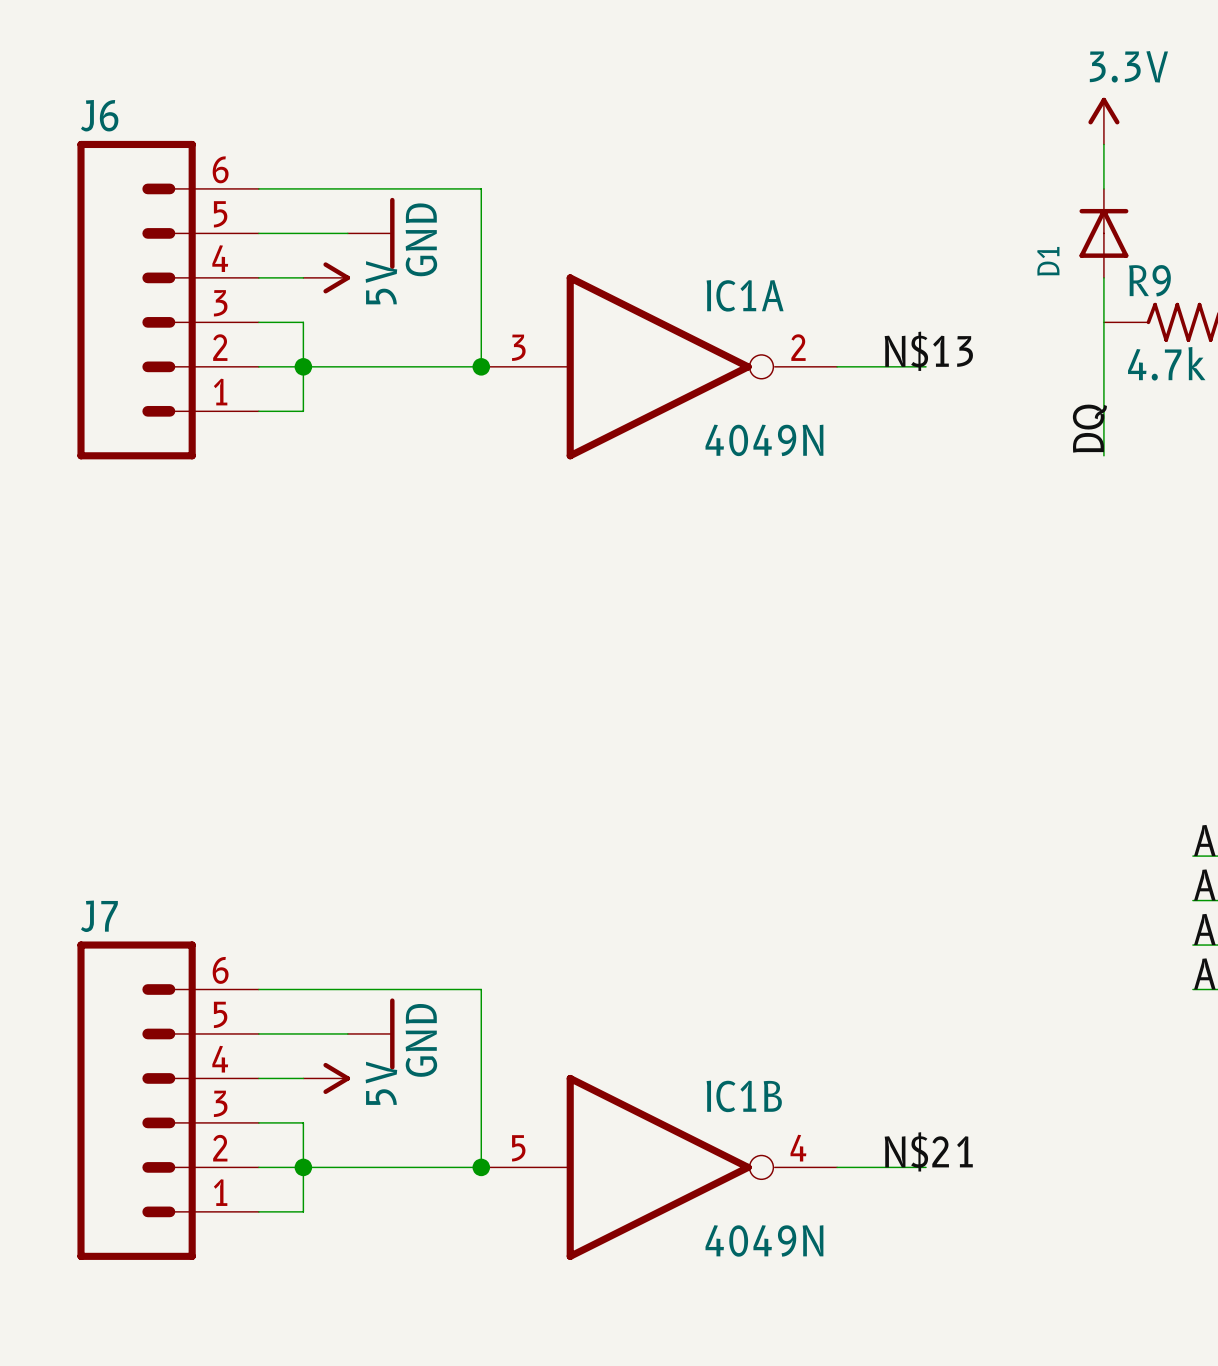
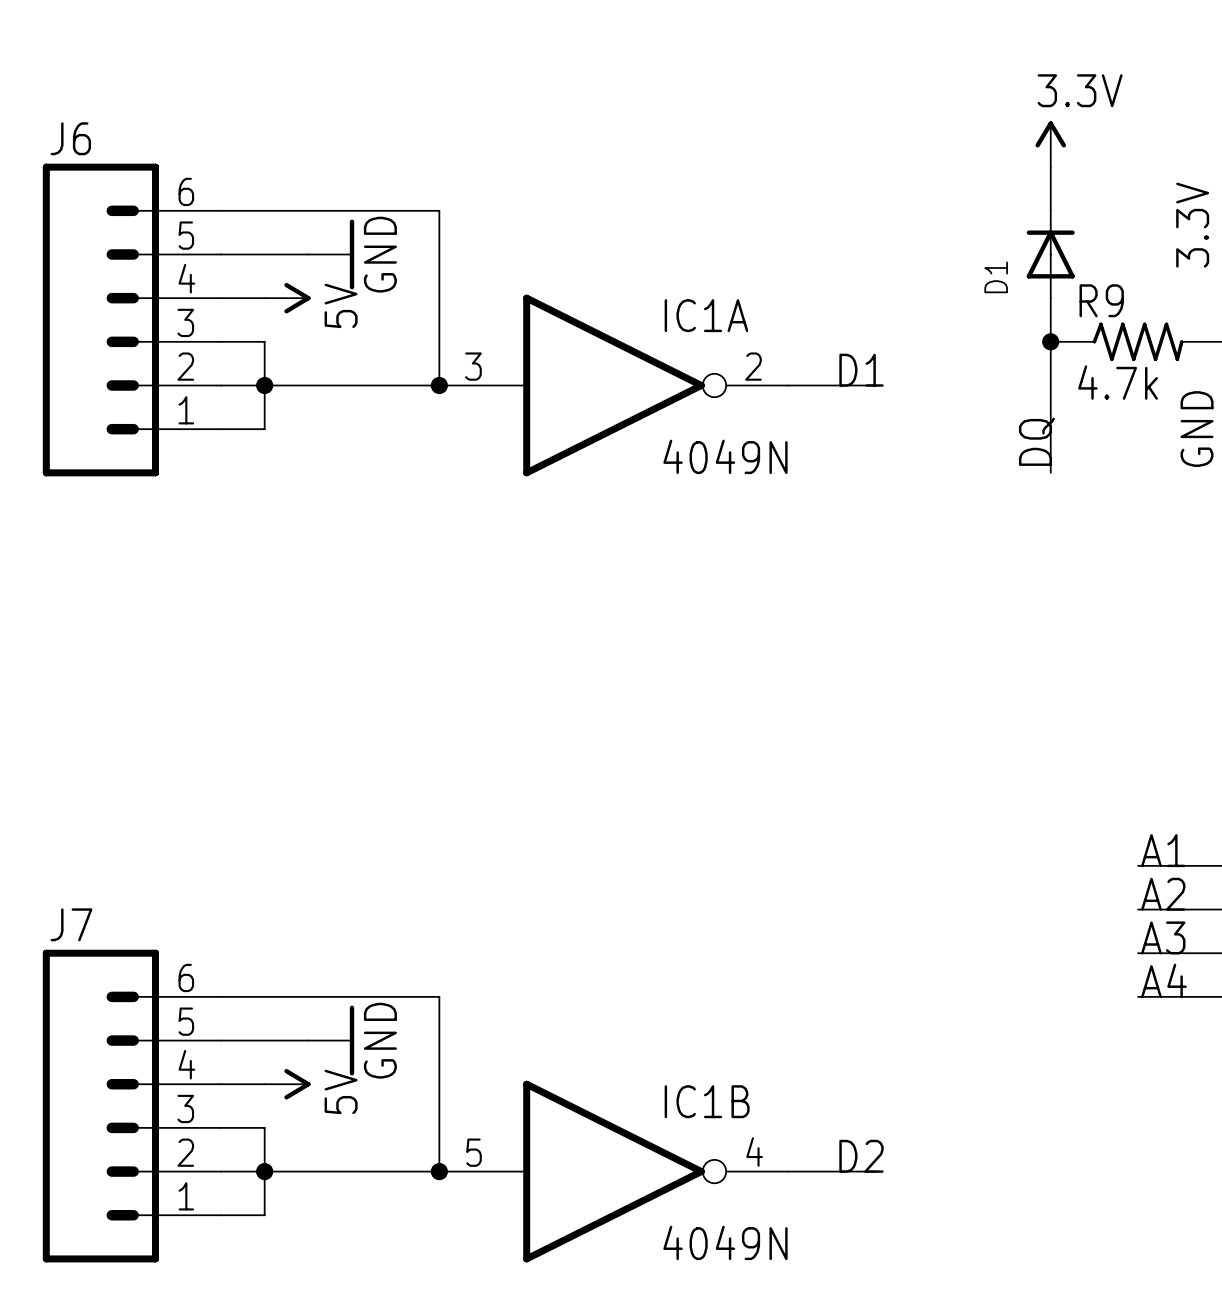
junction: none -> (1050, 341)
label: N$13 (928, 351) -> D1 (861, 370)
label: N$21 (928, 1151) -> D2 (861, 1156)

